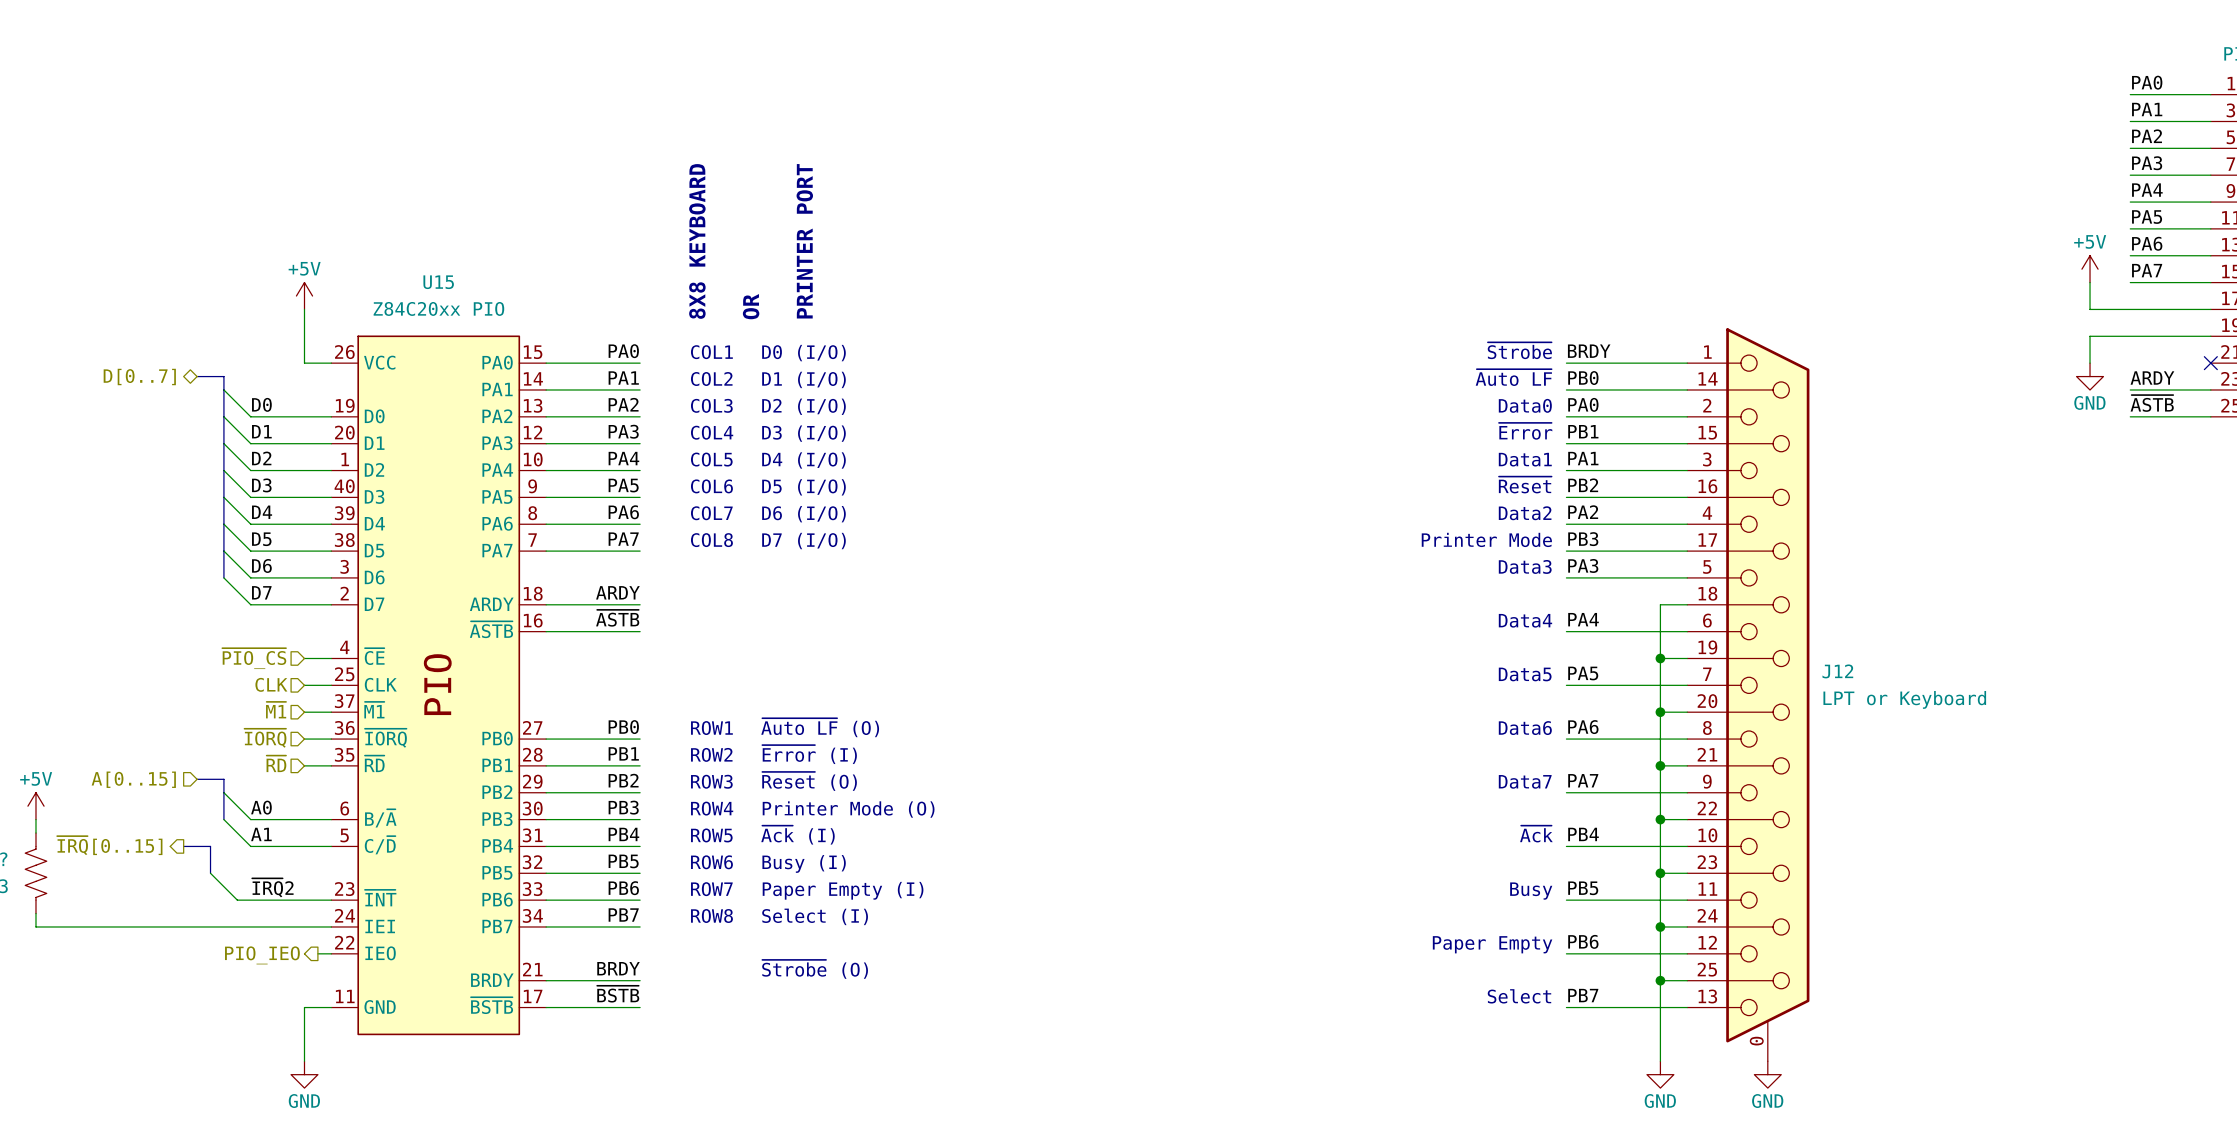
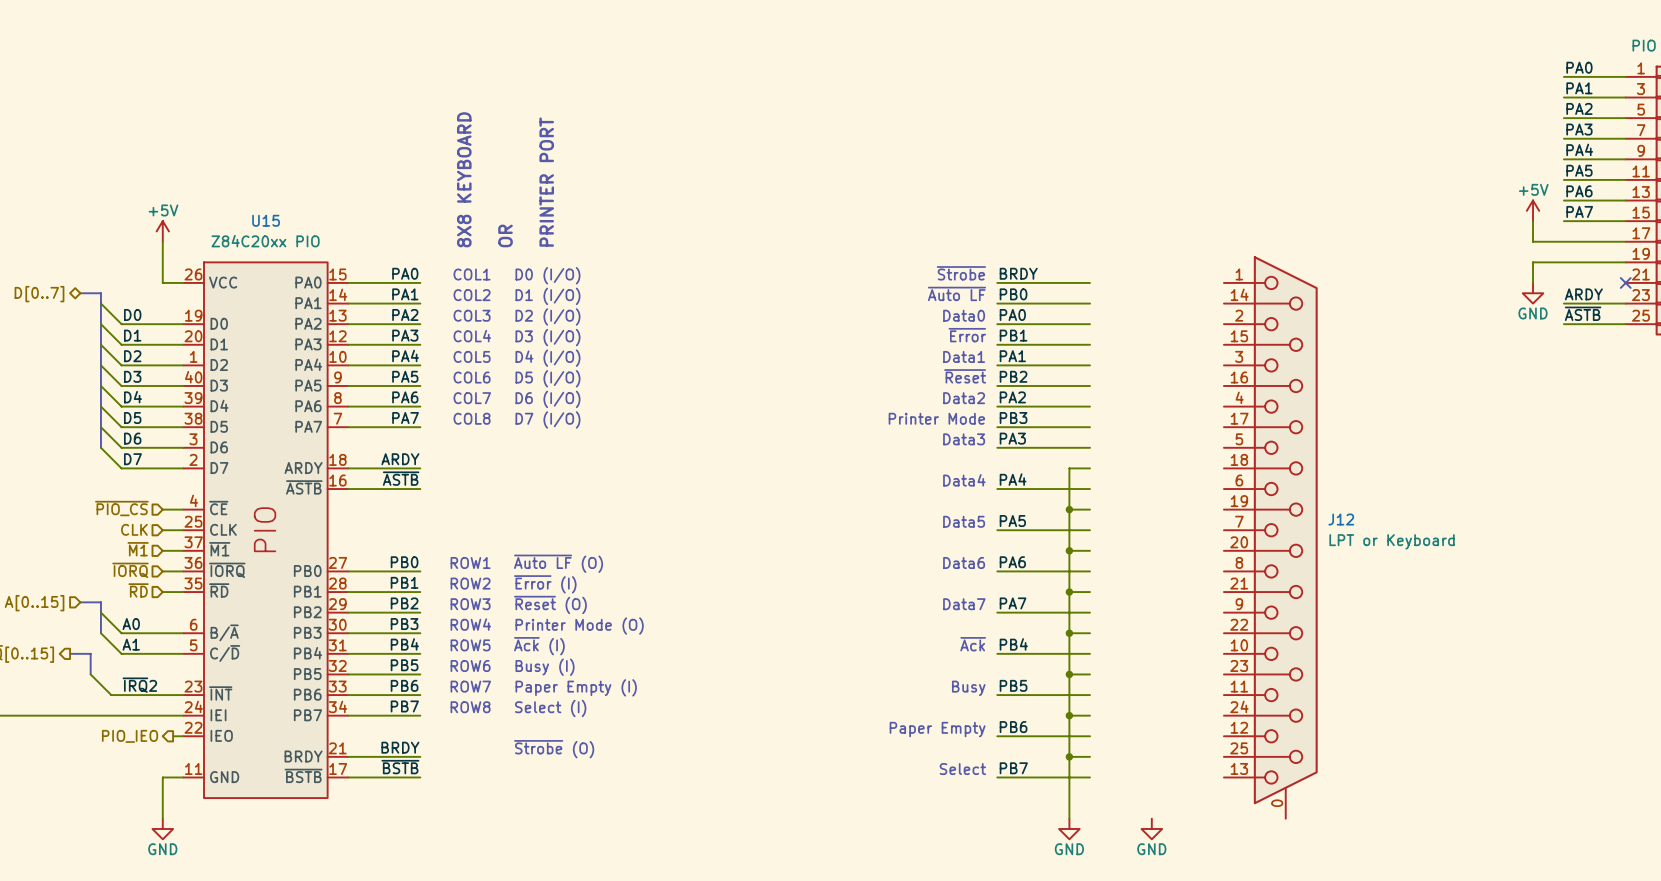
text position: ~{Strobe} (1519, 350) -> ~{Strobe} (961, 273)
label position: BRDY (1589, 351) -> BRDY (1018, 273)
wire: (1566, 363) (1687, 363) -> (997, 282) (1090, 282)
text position: ~{Auto LF} (1513, 377) -> ~{Auto LF} (956, 293)
label position: PB0 (1583, 378) -> PB0 (1013, 294)
wire: (1566, 389) (1687, 389) -> (997, 303) (1090, 303)
label position: PA0 (1583, 404) -> PA0 (1012, 314)
text position: Data0 (1525, 405) -> Data0 (964, 315)
wire: (1566, 416) (1687, 416) -> (997, 324) (1090, 324)
text position: ~{Error} (1525, 431) -> ~{Error} (967, 335)
label position: PB1 (1583, 431) -> PB1 (1013, 335)
wire: (1566, 443) (1687, 443) -> (997, 344) (1090, 344)
label position: PA1 (1583, 458) -> PA1 (1012, 356)
text position: Data1 (1525, 459) -> Data1 (964, 356)
wire: (1566, 470) (1687, 470) -> (997, 365) (1090, 365)
text position: ~{Reset} (1525, 484) -> ~{Reset} (965, 376)
label position: PB2 (1583, 485) -> PB2 (1013, 376)
wire: (1566, 497) (1687, 497) -> (997, 385) (1090, 385)
label position: PA2 (1583, 512) -> PA2 (1012, 397)
text position: Data2 (1525, 513) -> Data2 (964, 398)
wire: (1566, 524) (1687, 524) -> (997, 406) (1090, 406)
text position: Printer Mode (1486, 539) -> Printer Mode (936, 418)
label position: PB3 (1583, 539) -> PB3 (1013, 418)
wire: (1566, 551) (1687, 551) -> (997, 427) (1090, 427)
label position: PA3 (1583, 565) -> PA3 (1012, 438)
text position: Data3 (1525, 566) -> Data3 (964, 439)
wire: (1566, 577) (1687, 577) -> (997, 447) (1090, 447)
wire: (1687, 604) (1660, 604) (1660, 1061) -> (1090, 468) (1069, 468) (1069, 818)
label position: PA4 (1583, 619) -> PA4 (1013, 479)
text position: Data4 (1525, 620) -> Data4 (964, 480)
wire: (1566, 631) (1687, 631) -> (997, 489) (1090, 489)
junction: none -> (1069, 509)
wire: (1660, 658) (1687, 658) -> (1069, 509) (1090, 509)
junction: (1660, 658) -> none
label position: PA5 (1583, 673) -> PA5 (1012, 521)
text position: Data5 (1525, 674) -> Data5 (964, 521)
wire: (1566, 685) (1687, 685) -> (997, 530) (1090, 530)
junction: none -> (1069, 550)
wire: (1660, 712) (1687, 712) -> (1069, 550) (1090, 550)
junction: (1660, 712) -> none
label position: PA6 (1583, 727) -> PA6 (1012, 562)
text position: Data6 (1525, 728) -> Data6 (964, 562)
wire: (1566, 739) (1687, 739) -> (997, 571) (1090, 571)
junction: none -> (1069, 592)
wire: (1660, 765) (1687, 765) -> (1069, 592) (1090, 592)
junction: (1660, 765) -> none
label position: PA7 (1583, 780) -> PA7 (1013, 603)
text position: Data7 (1525, 781) -> Data7 (964, 604)
wire: (1566, 792) (1687, 792) -> (997, 612) (1090, 612)
junction: none -> (1069, 633)
wire: (1660, 819) (1687, 819) -> (1069, 633) (1090, 633)
junction: (1660, 819) -> none
text position: ~{Ack} (1536, 834) -> ~{Ack} (973, 644)
label position: PB4 (1583, 834) -> PB4 (1013, 644)
wire: (1566, 846) (1687, 846) -> (997, 653) (1090, 653)
junction: none -> (1069, 674)
wire: (1660, 873) (1687, 873) -> (1069, 674) (1090, 674)
junction: (1660, 873) -> none
label position: PB5 (1583, 888) -> PB5 (1013, 685)
text position: Busy (1531, 891) -> Busy (968, 688)
wire: (1566, 900) (1687, 900) -> (997, 695) (1090, 695)
junction: none -> (1069, 715)
wire: (1660, 926) (1687, 926) -> (1069, 715) (1090, 715)
junction: (1660, 926) -> none
label position: PB6 (1583, 941) -> PB6 (1013, 727)
text position: Paper Empty (1492, 944) -> Paper Empty (937, 729)
wire: (1566, 953) (1687, 953) -> (997, 736) (1090, 736)
junction: none -> (1069, 756)
wire: (1660, 980) (1687, 980) -> (1069, 756) (1090, 756)
junction: (1660, 980) -> none
label position: PB7 (1583, 995) -> PB7 (1013, 768)
text position: Select (1519, 996) -> Select (962, 769)
wire: (1566, 1007) (1687, 1007) -> (997, 777) (1090, 777)
power symbol: none -> GND (1069, 828)
power symbol position: GND (1660, 1074) -> GND (1151, 828)
power symbol: GND (1767, 1074) -> none

